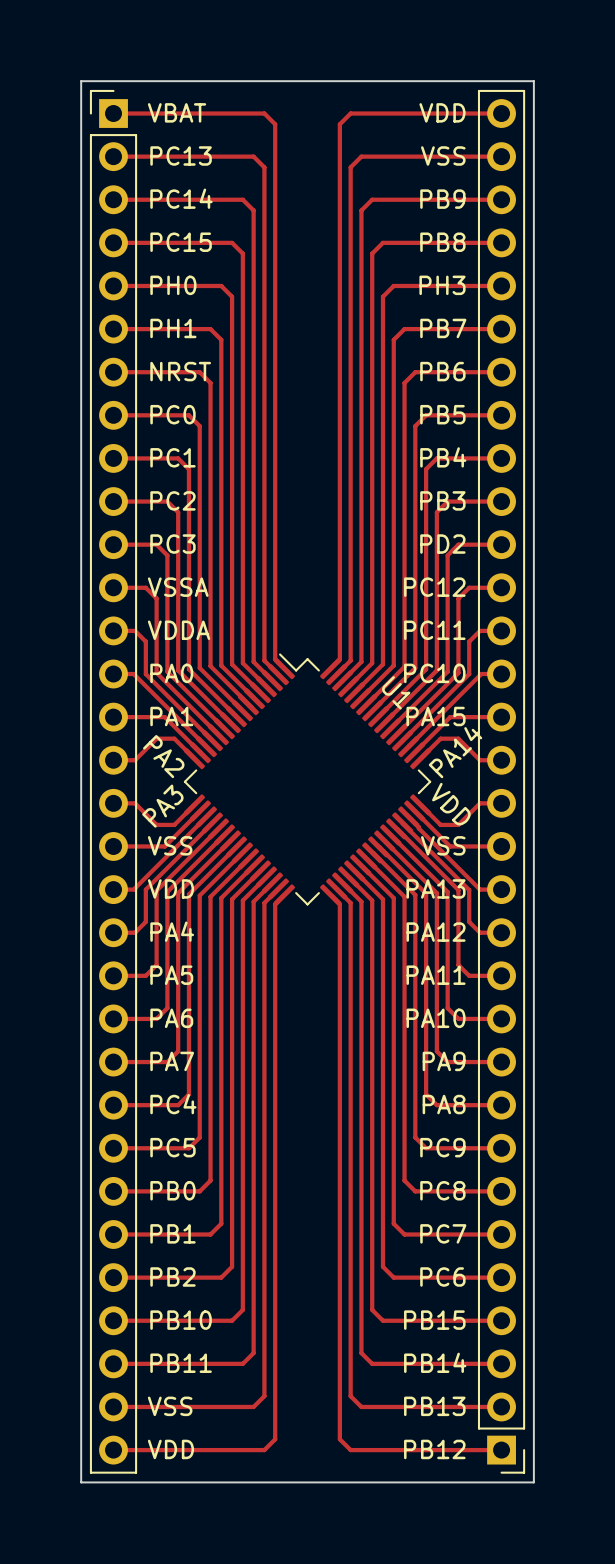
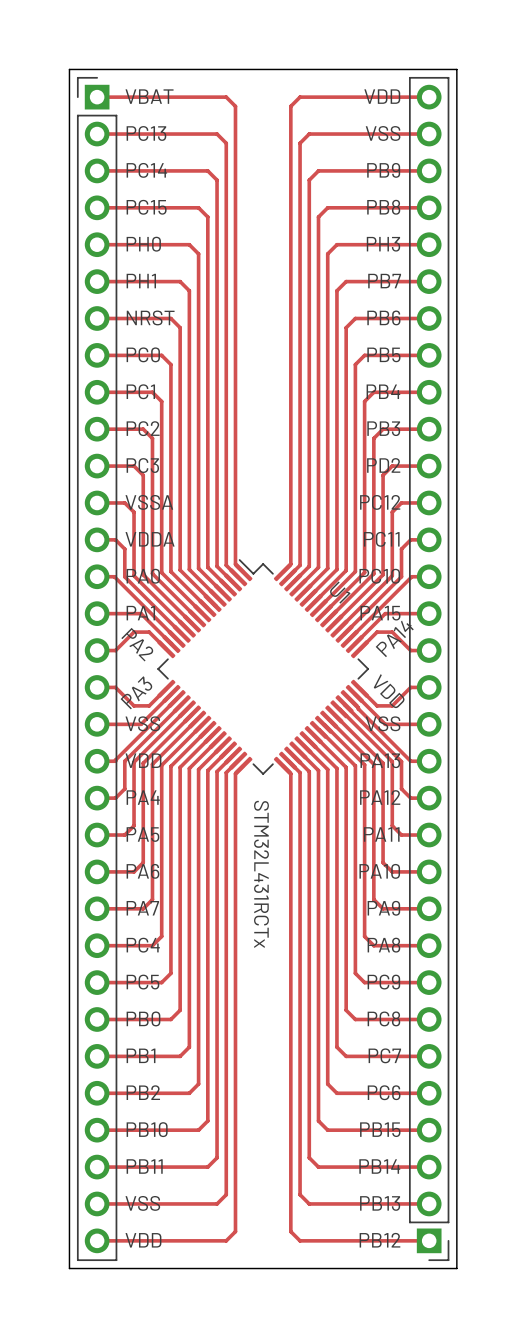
U1 value: none -> STM32L431RCTx (261, 874)

